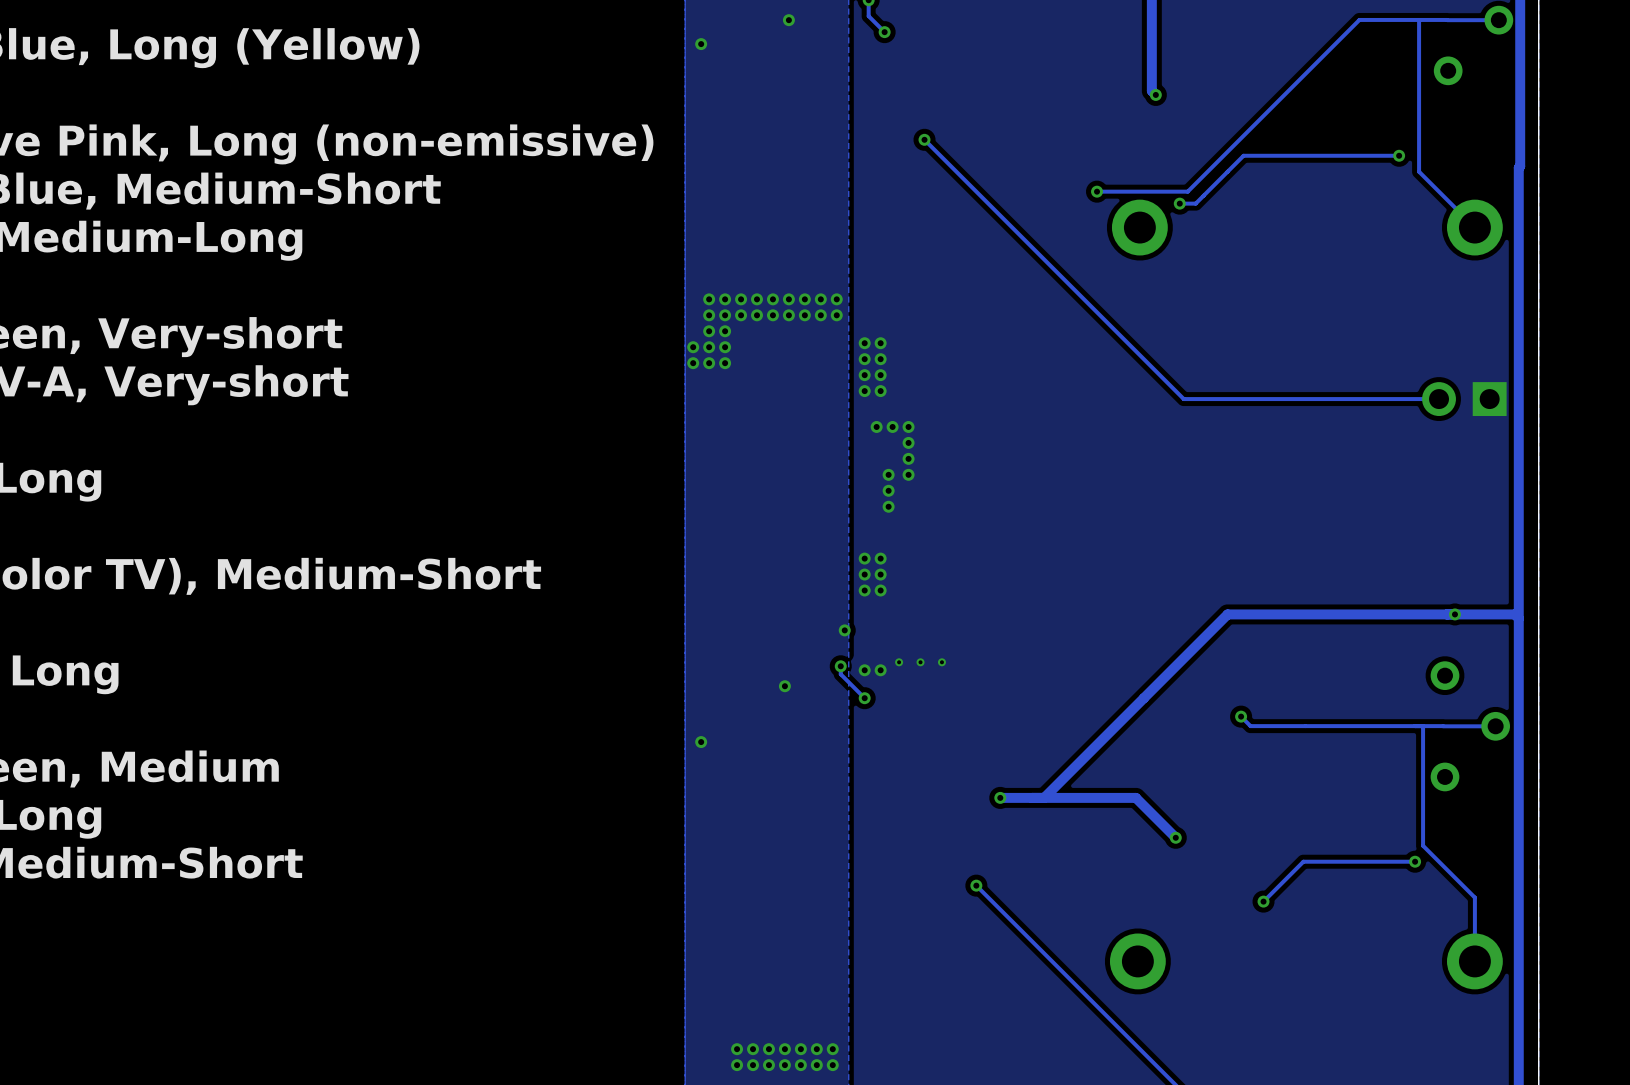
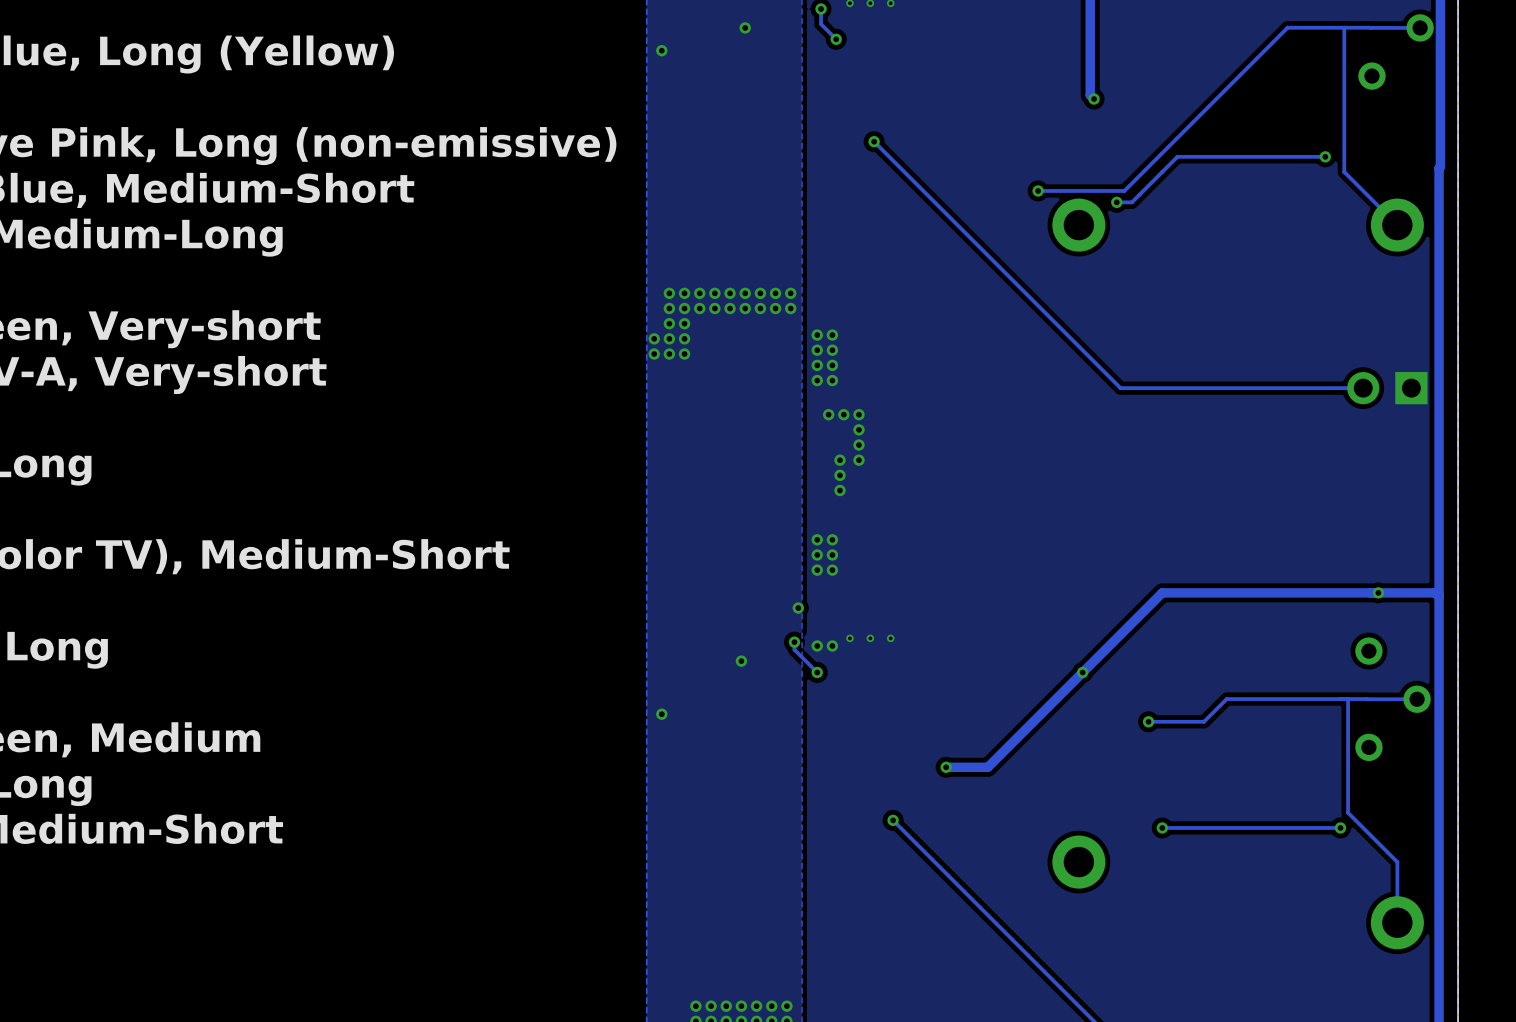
via: none -> (1082, 672)
track: (1241, 716) (1250, 726) (1295, 726) -> (1148, 721) (1204, 721) (1226, 699)
via position: (1241, 716) -> (1148, 721)
track: (1044, 797) (1135, 797) (1175, 837) -> none
via: (1175, 837) -> none
track: none -> (893, 820) (923, 850)
via: none -> (1162, 827)
track: (1303, 861) (1263, 901) -> (1234, 827) (1162, 827)
via position: (976, 885) -> (893, 820)
via: (1263, 901) -> none
part position: (1137, 961) -> (1078, 862)

